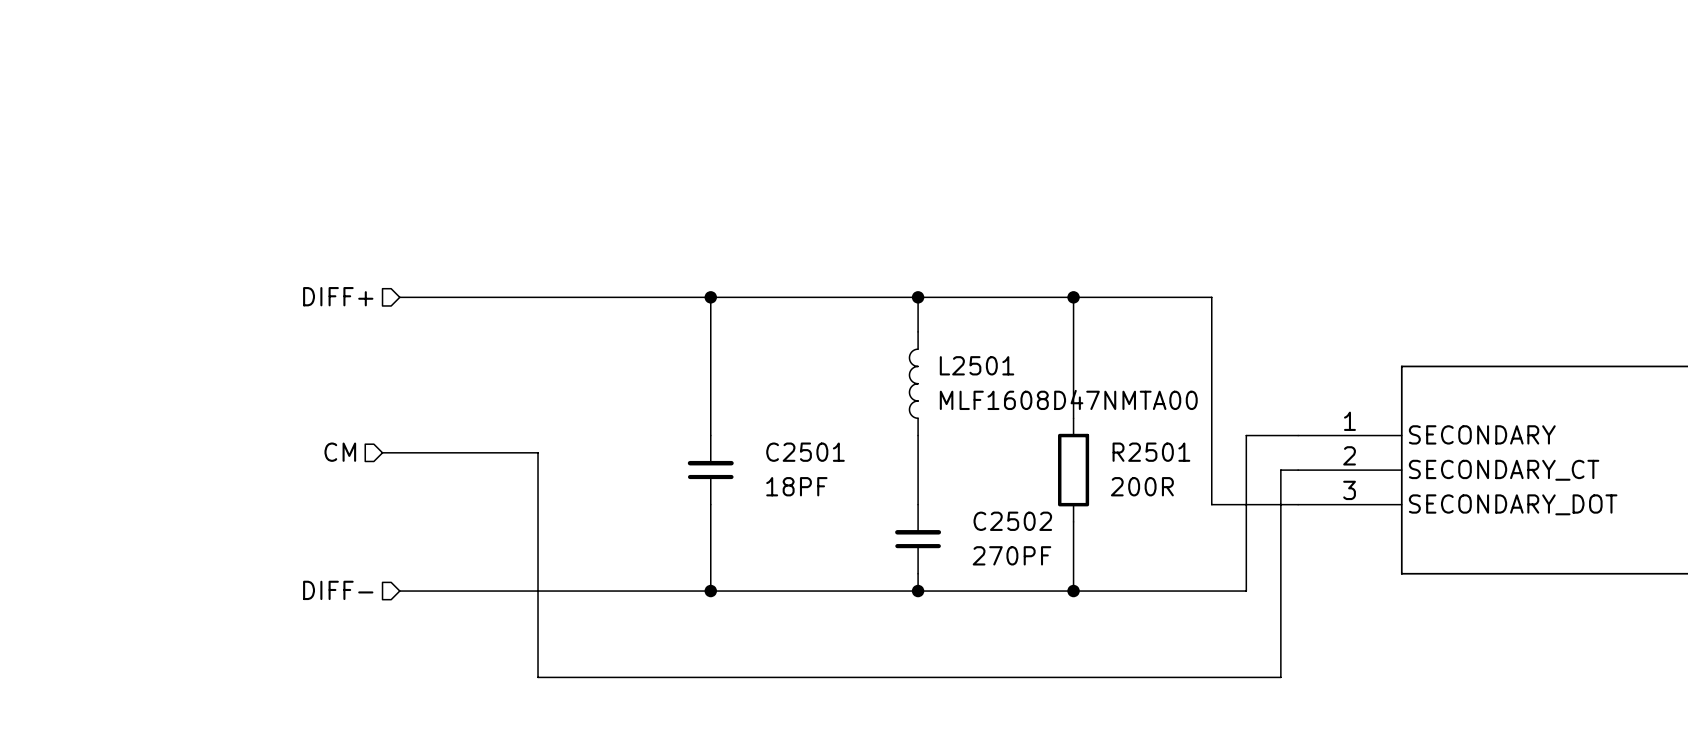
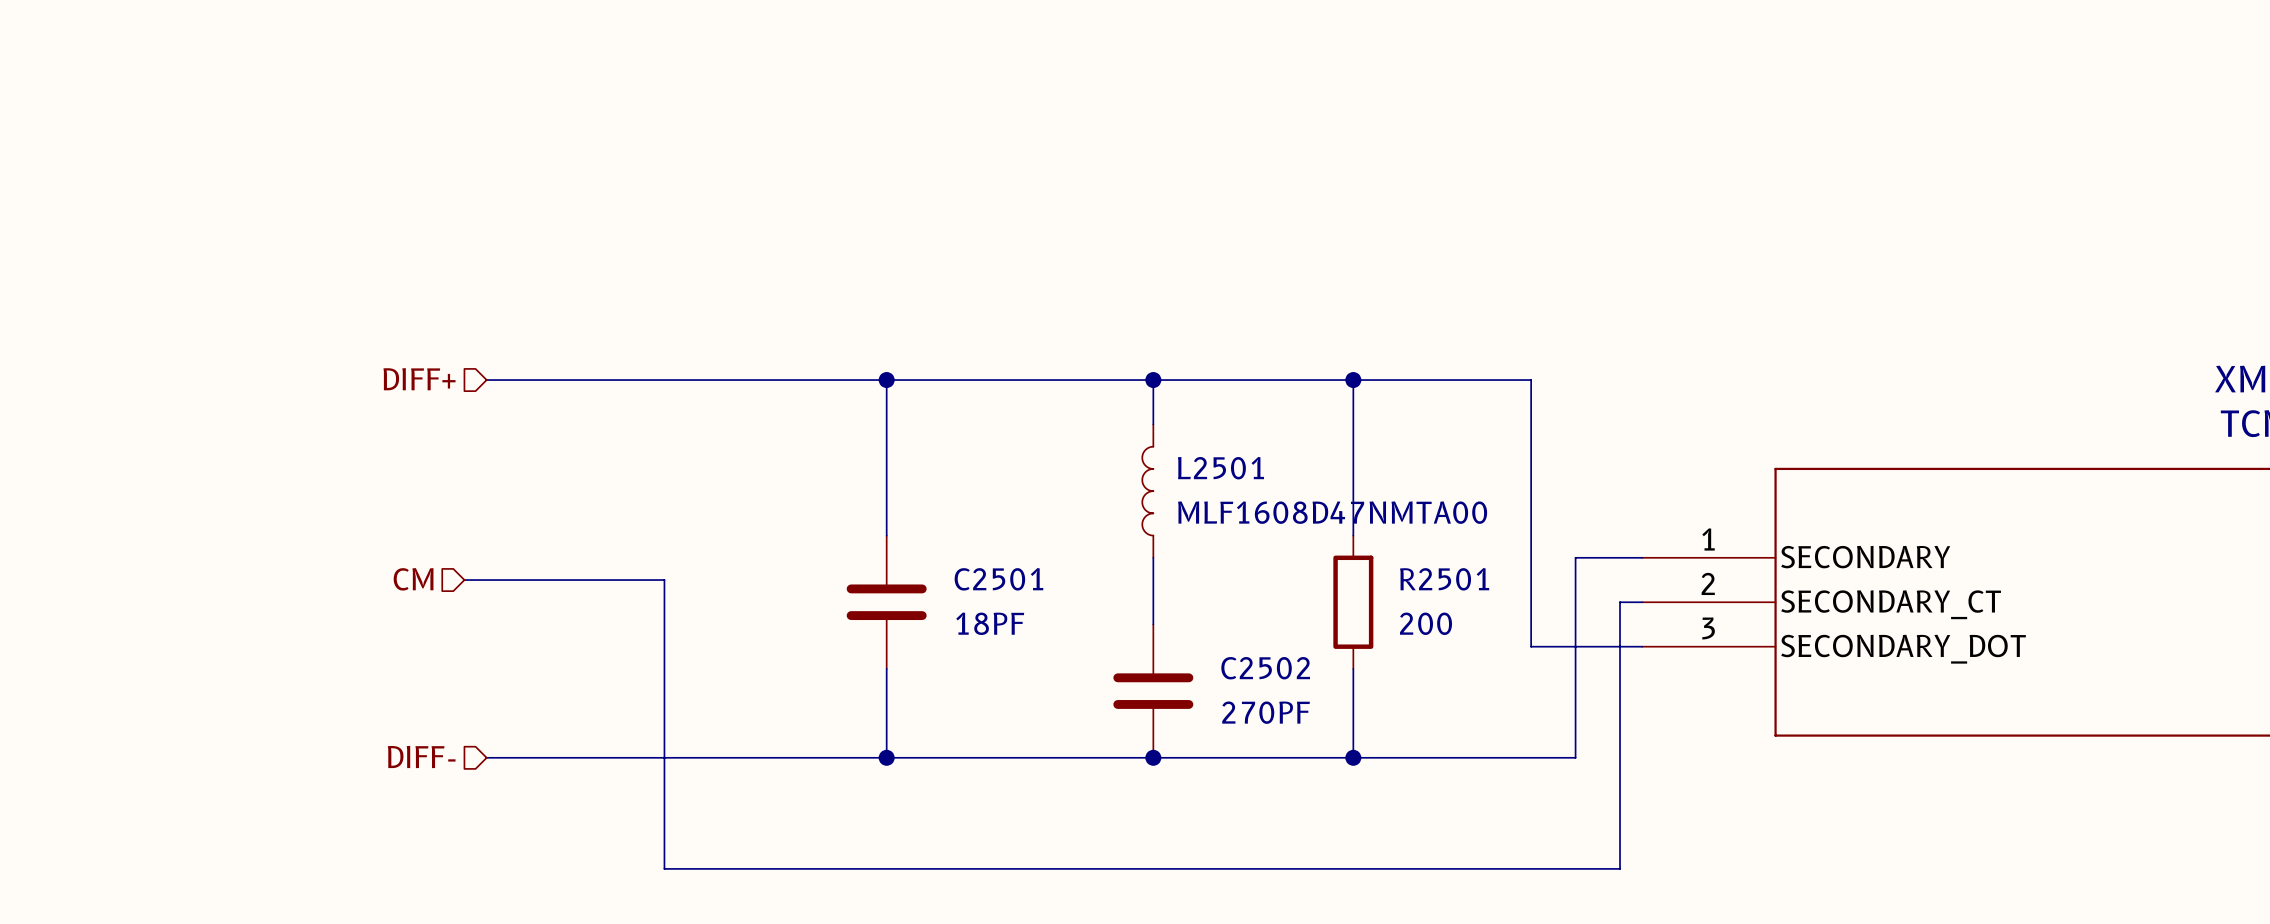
C2501 symbol: [687, 435, 734, 505] -> [846, 535, 927, 669]
R2501 value: 200R (1142, 486) -> 200 (1426, 623)
C2502 symbol: [895, 504, 942, 574] -> [1113, 624, 1194, 758]

